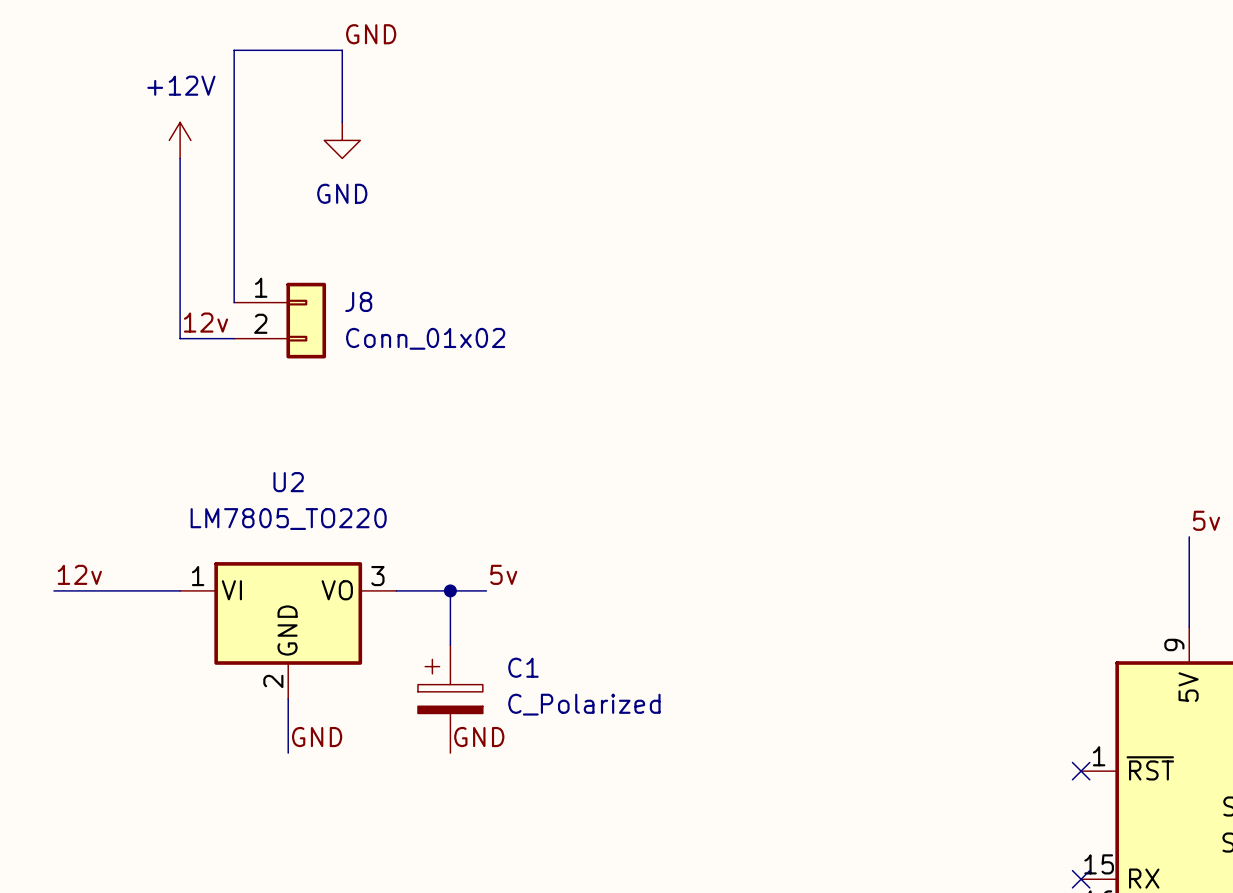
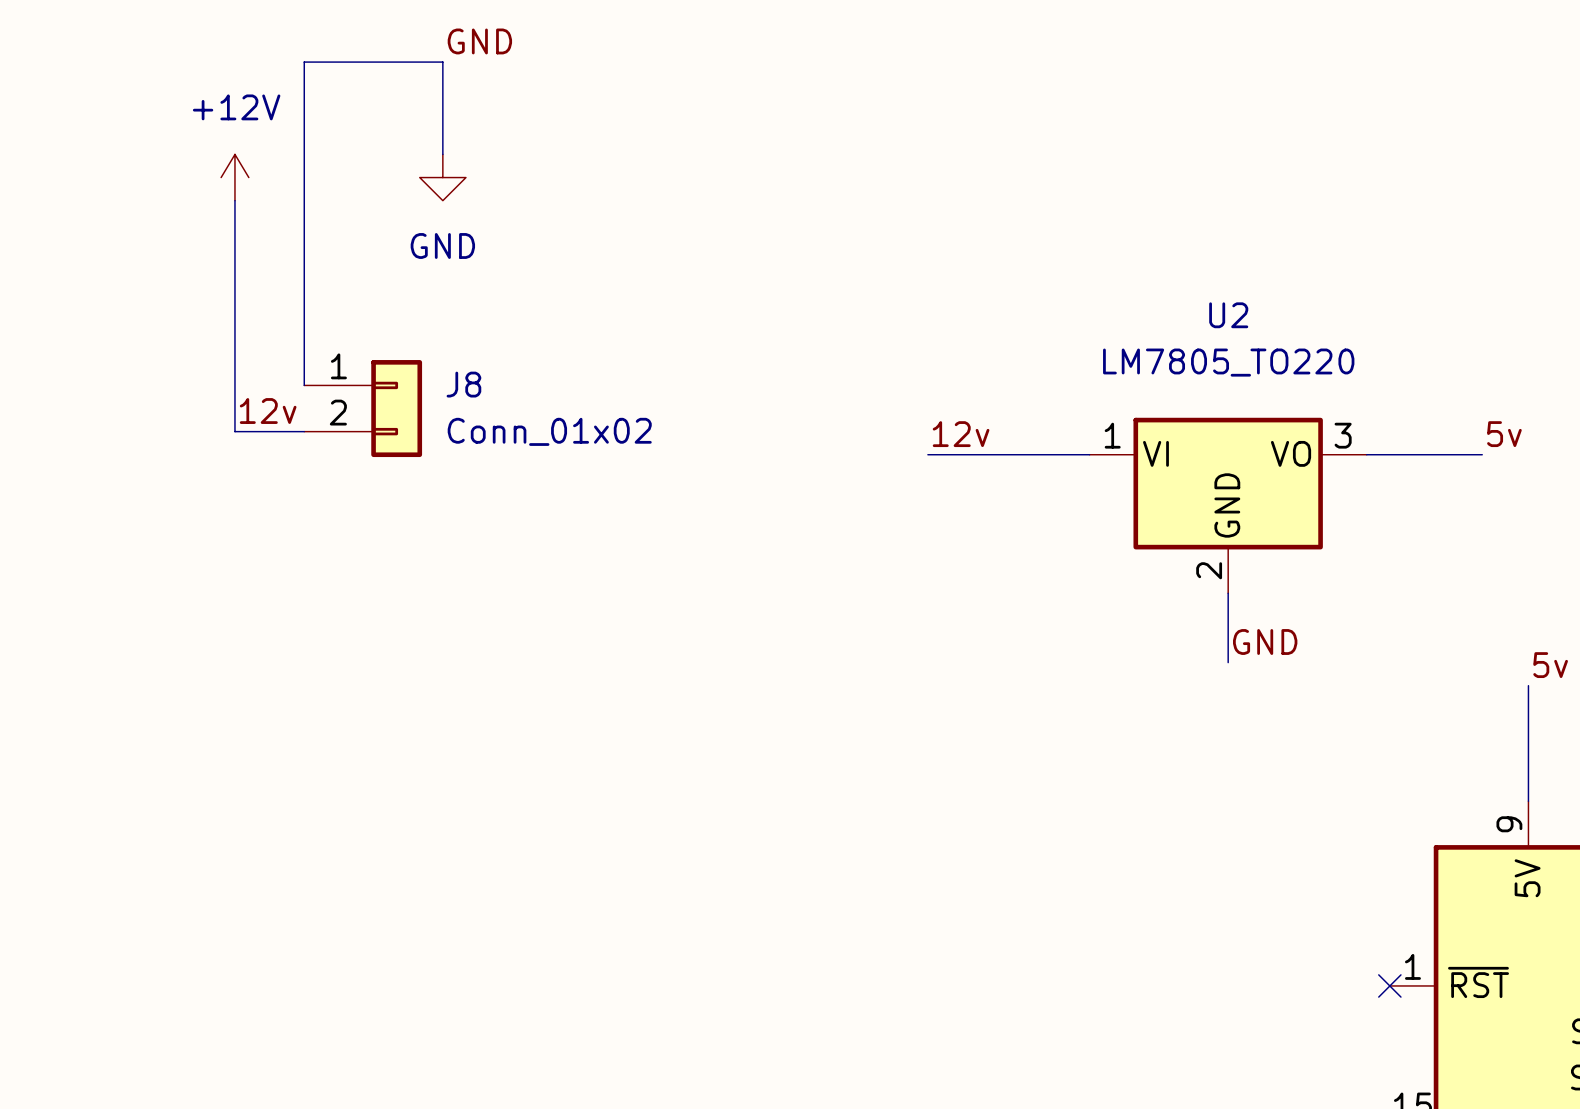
label: none -> 12v (961, 434)
label: none -> 5v (1504, 434)
wire: none -> (927, 454) (1089, 454)
wire: none -> (1366, 454) (1482, 454)
wire: none -> (1228, 593) (1228, 662)
label: none -> GND (1265, 642)
label: 12v (79, 574) -> none
label: 5v (503, 574) -> none
wire: (53, 590) (180, 590) -> none
wire: (396, 590) (486, 590) -> none
wire: (450, 590) (450, 644) -> none
junction: (450, 590) -> none
U2 position: (288, 630) -> (1228, 505)
wire: (288, 699) (288, 753) -> none
C1: C_Polarized (450, 699) -> none
label: GND (317, 737) -> none
label: GND (479, 737) -> none

